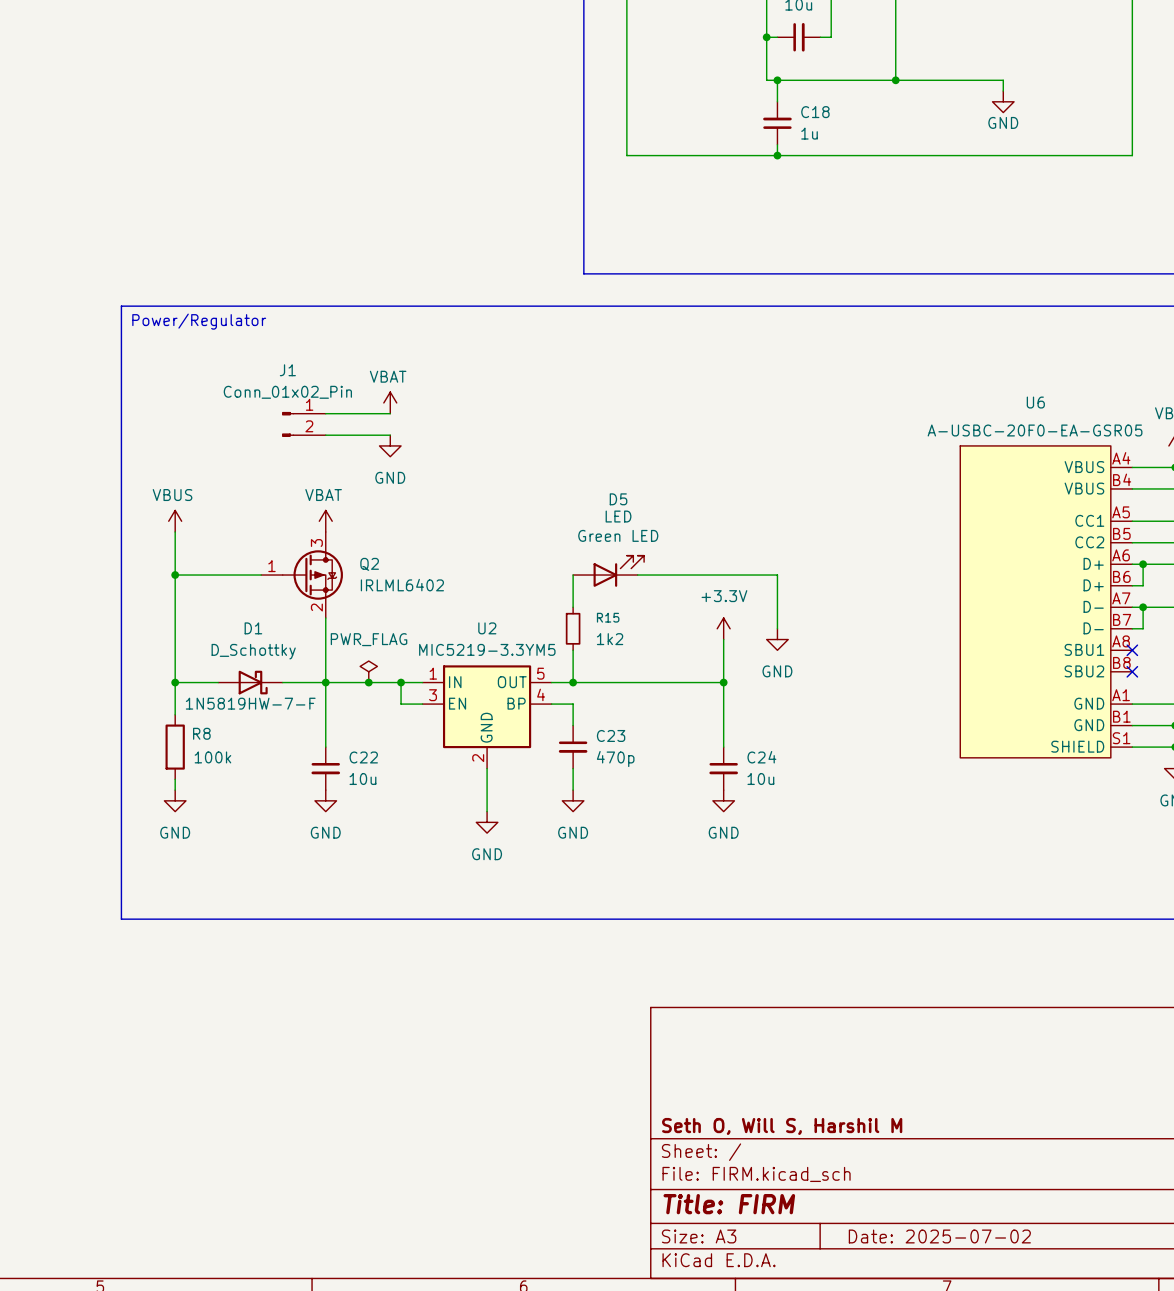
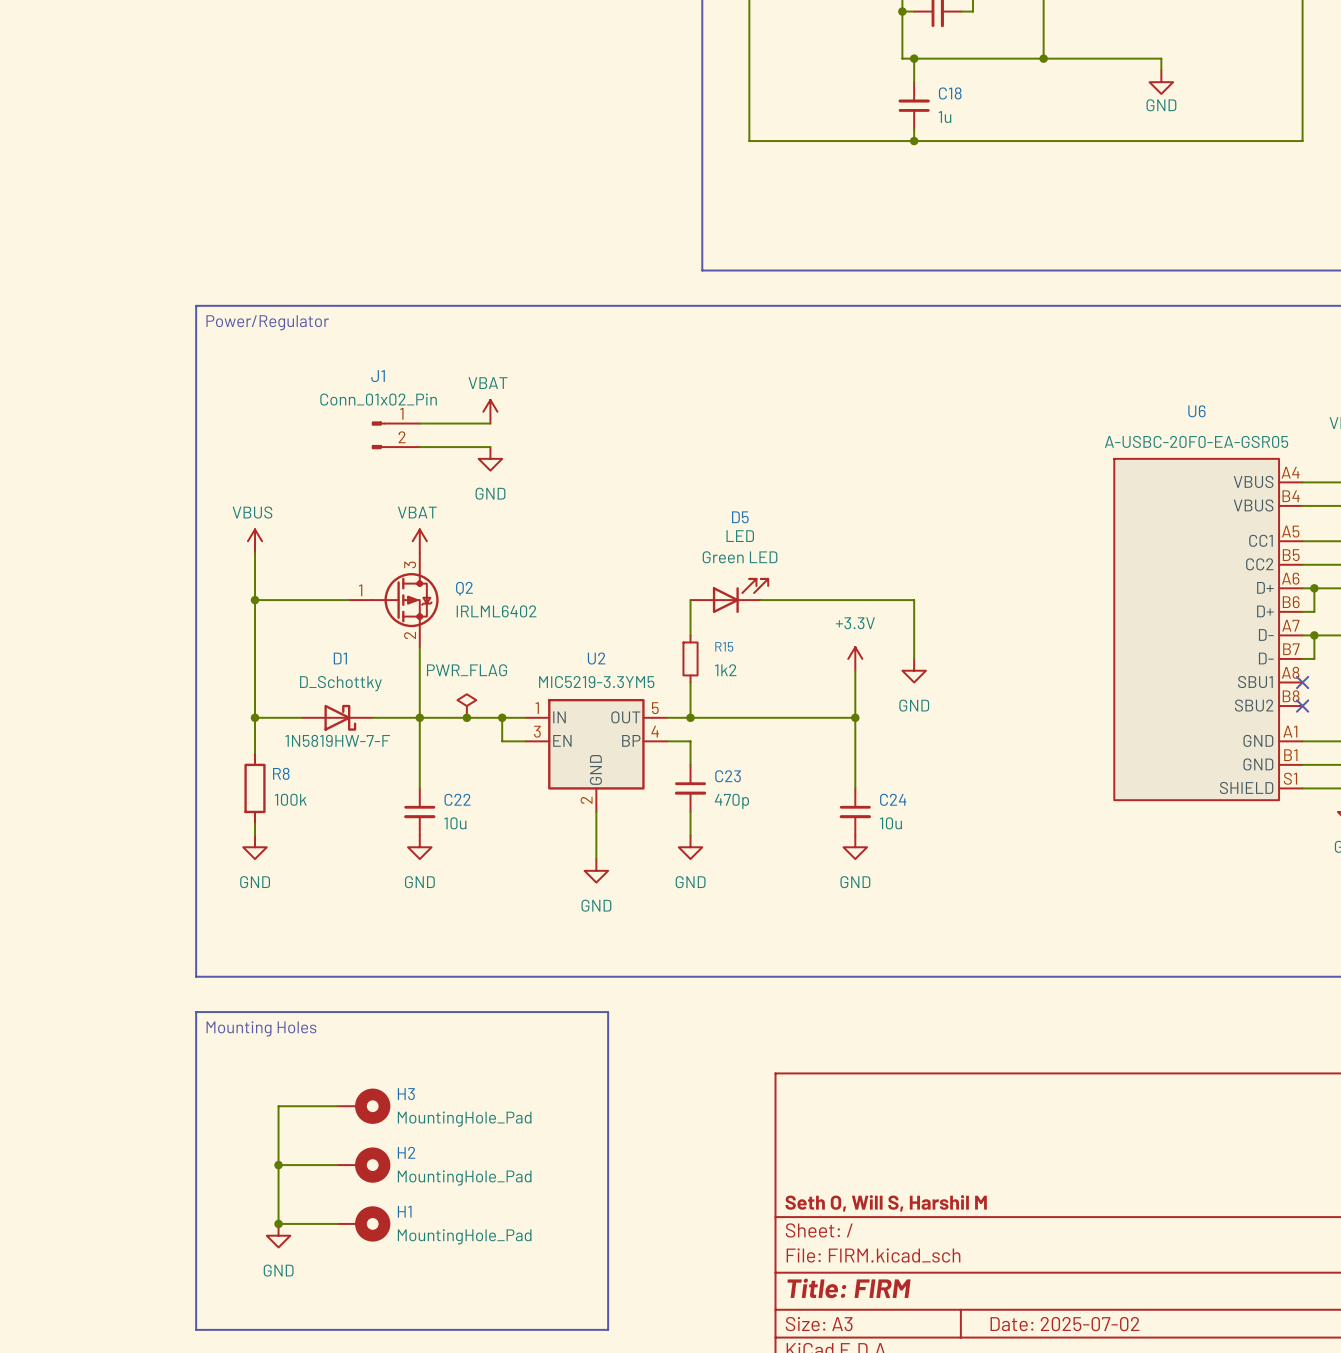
line: none -> (196, 1012) (608, 1012) (608, 1329) (196, 1329) (196, 1012)
text: none -> Mounting Holes (261, 1028)
wire: none -> (337, 1106) (278, 1106) (278, 1223) (337, 1223)
H3: none -> MountingHole_Pad (363, 1106)
wire: none -> (278, 1165) (337, 1165)
junction: none -> (278, 1165)
H2: none -> MountingHole_Pad (363, 1165)
junction: none -> (278, 1223)
H1: none -> MountingHole_Pad (363, 1223)
power symbol: none -> GND (278, 1235)

